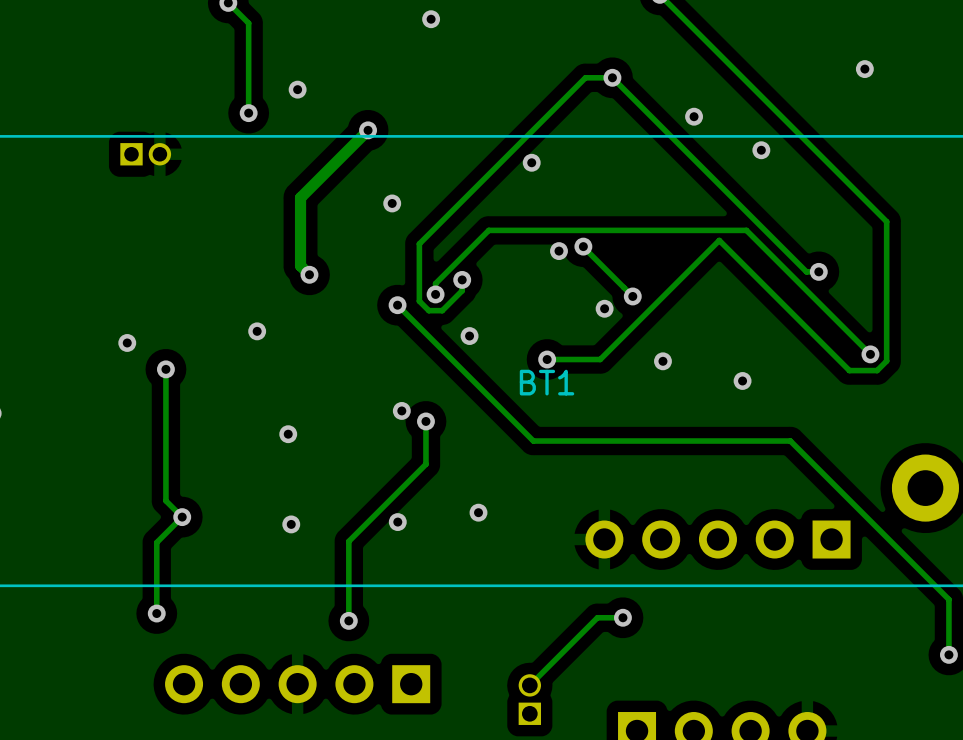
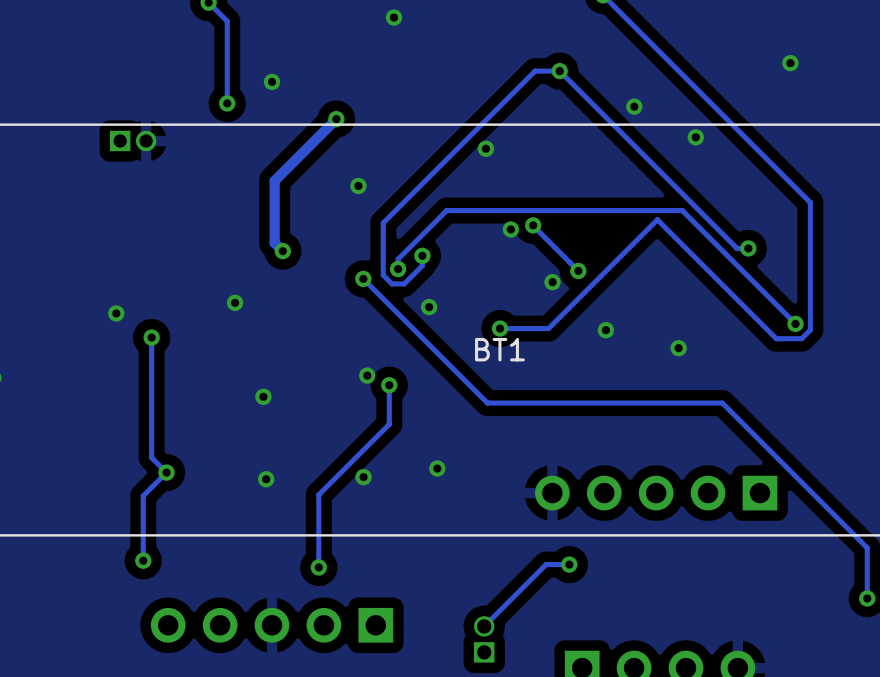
part: (925, 488) -> none

